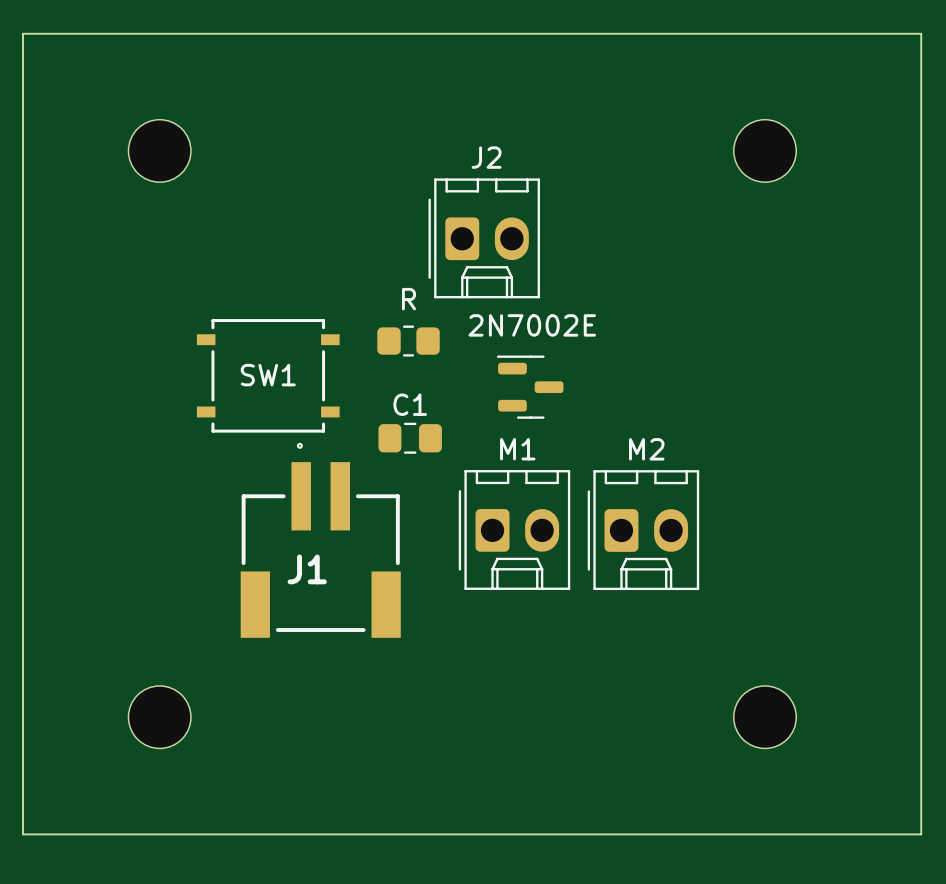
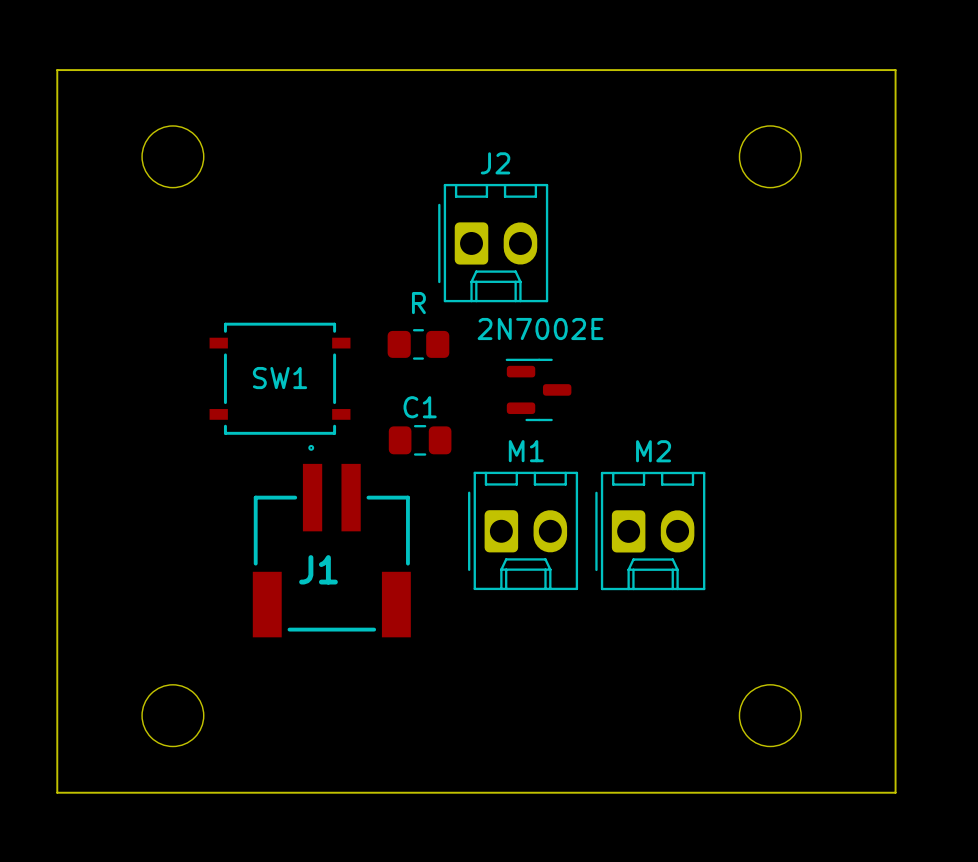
board edge: (23, 33) (921, 33) (921, 834) (23, 834) (23, 33) -> (57, 70) (57, 792) (895, 792) (895, 70) (57, 70)

